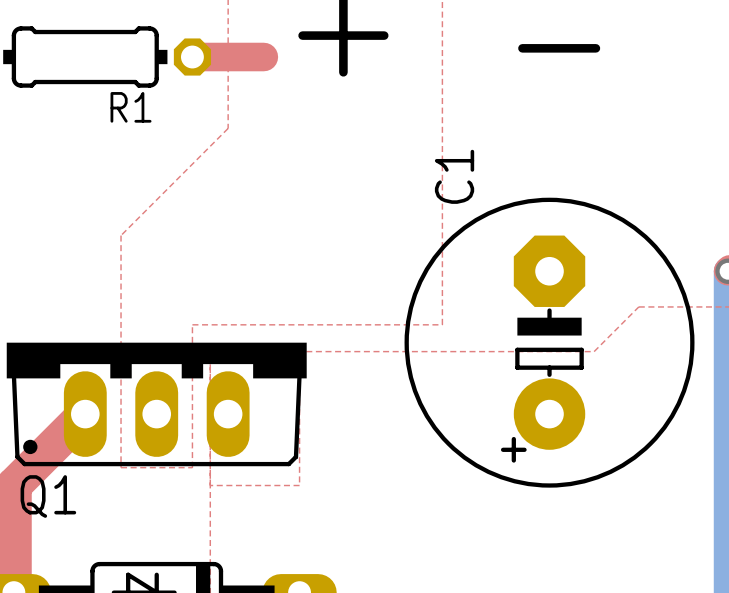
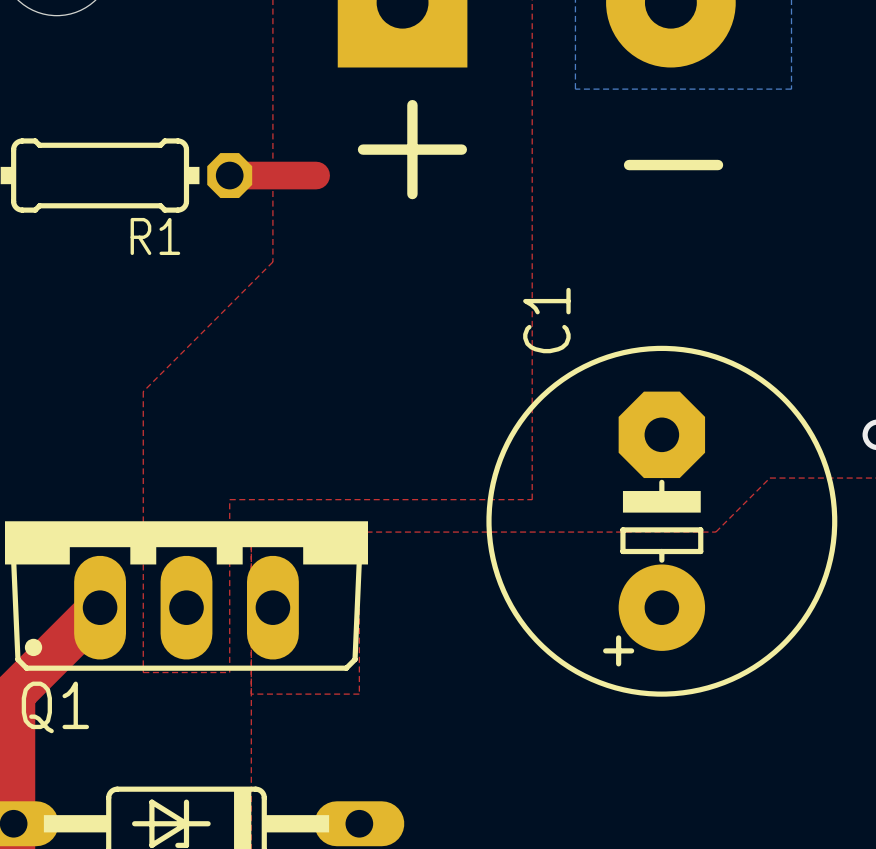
top track width: thick (192, 57) (263, 57) -> thin (229, 175) (316, 175)

